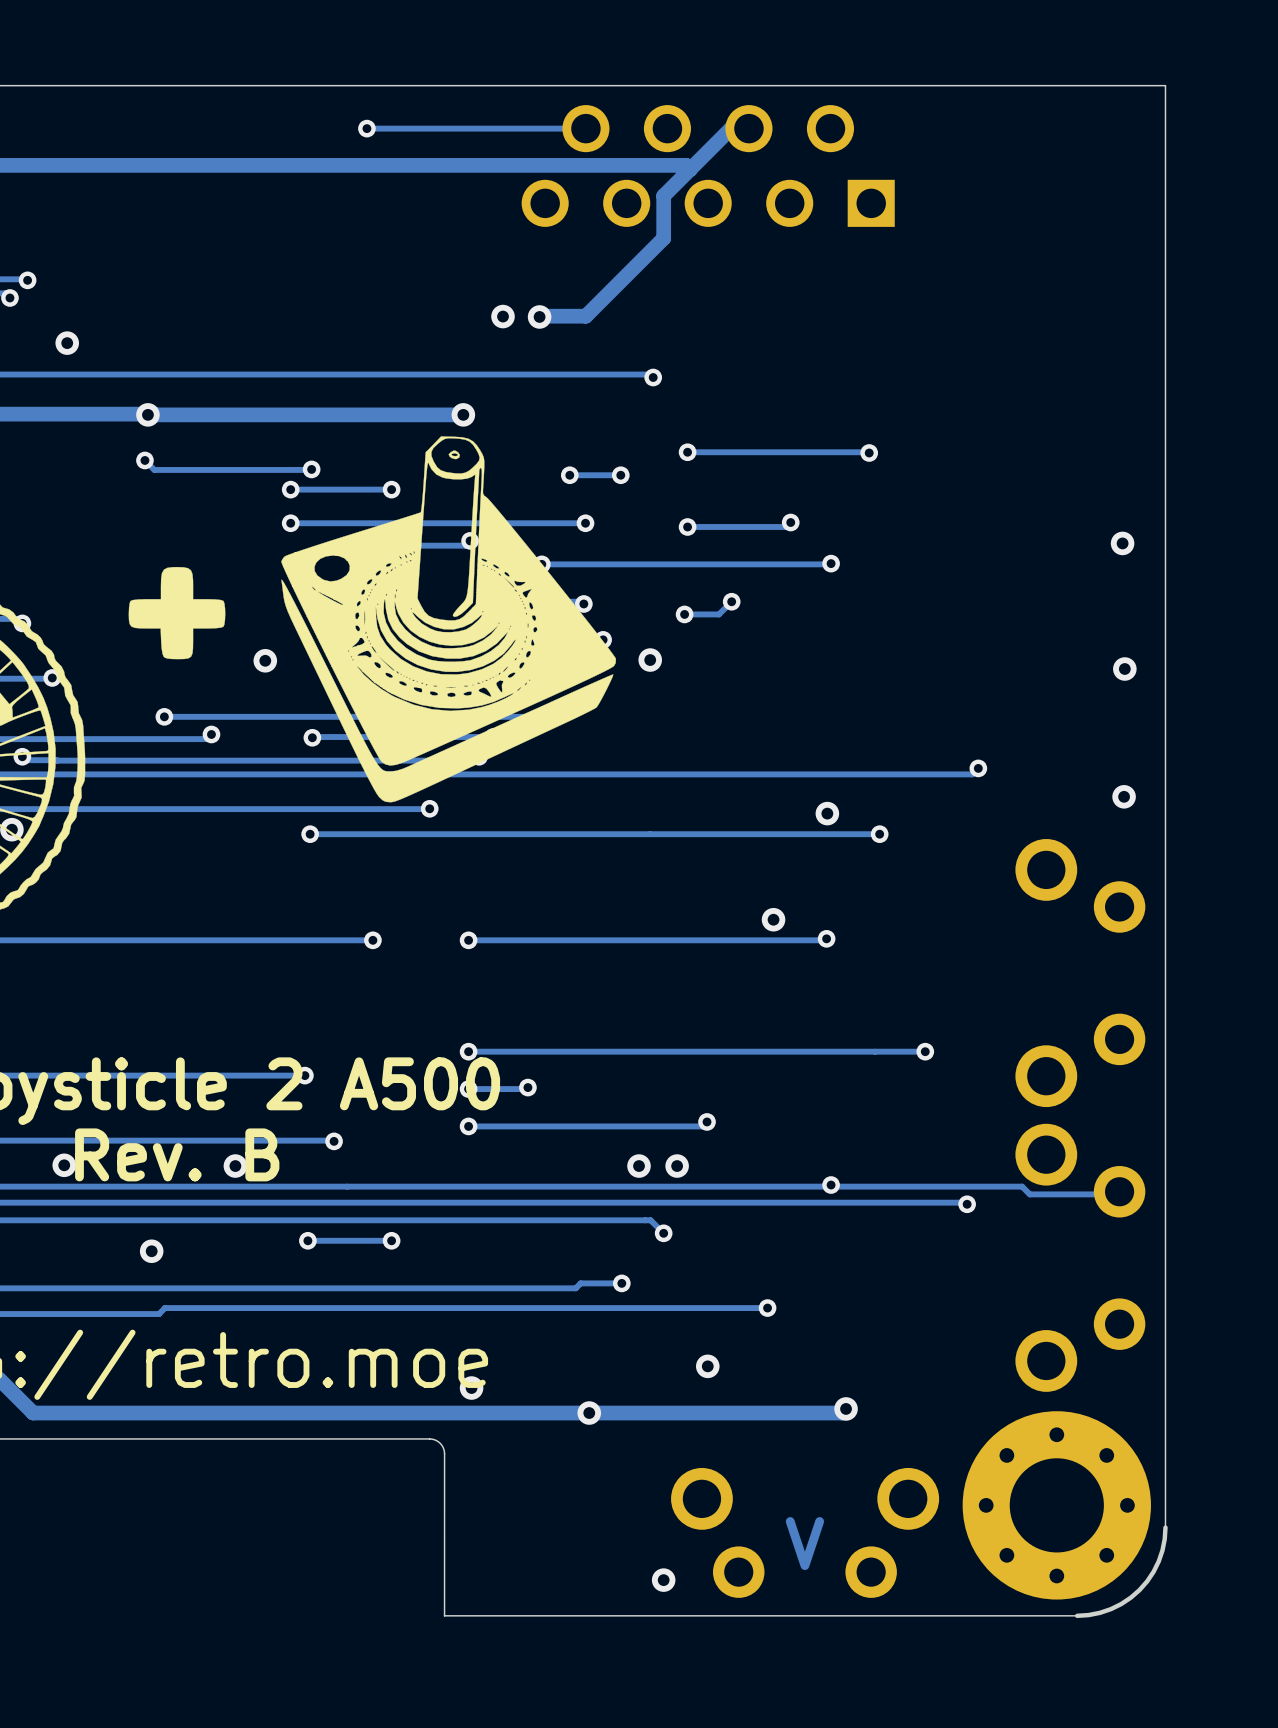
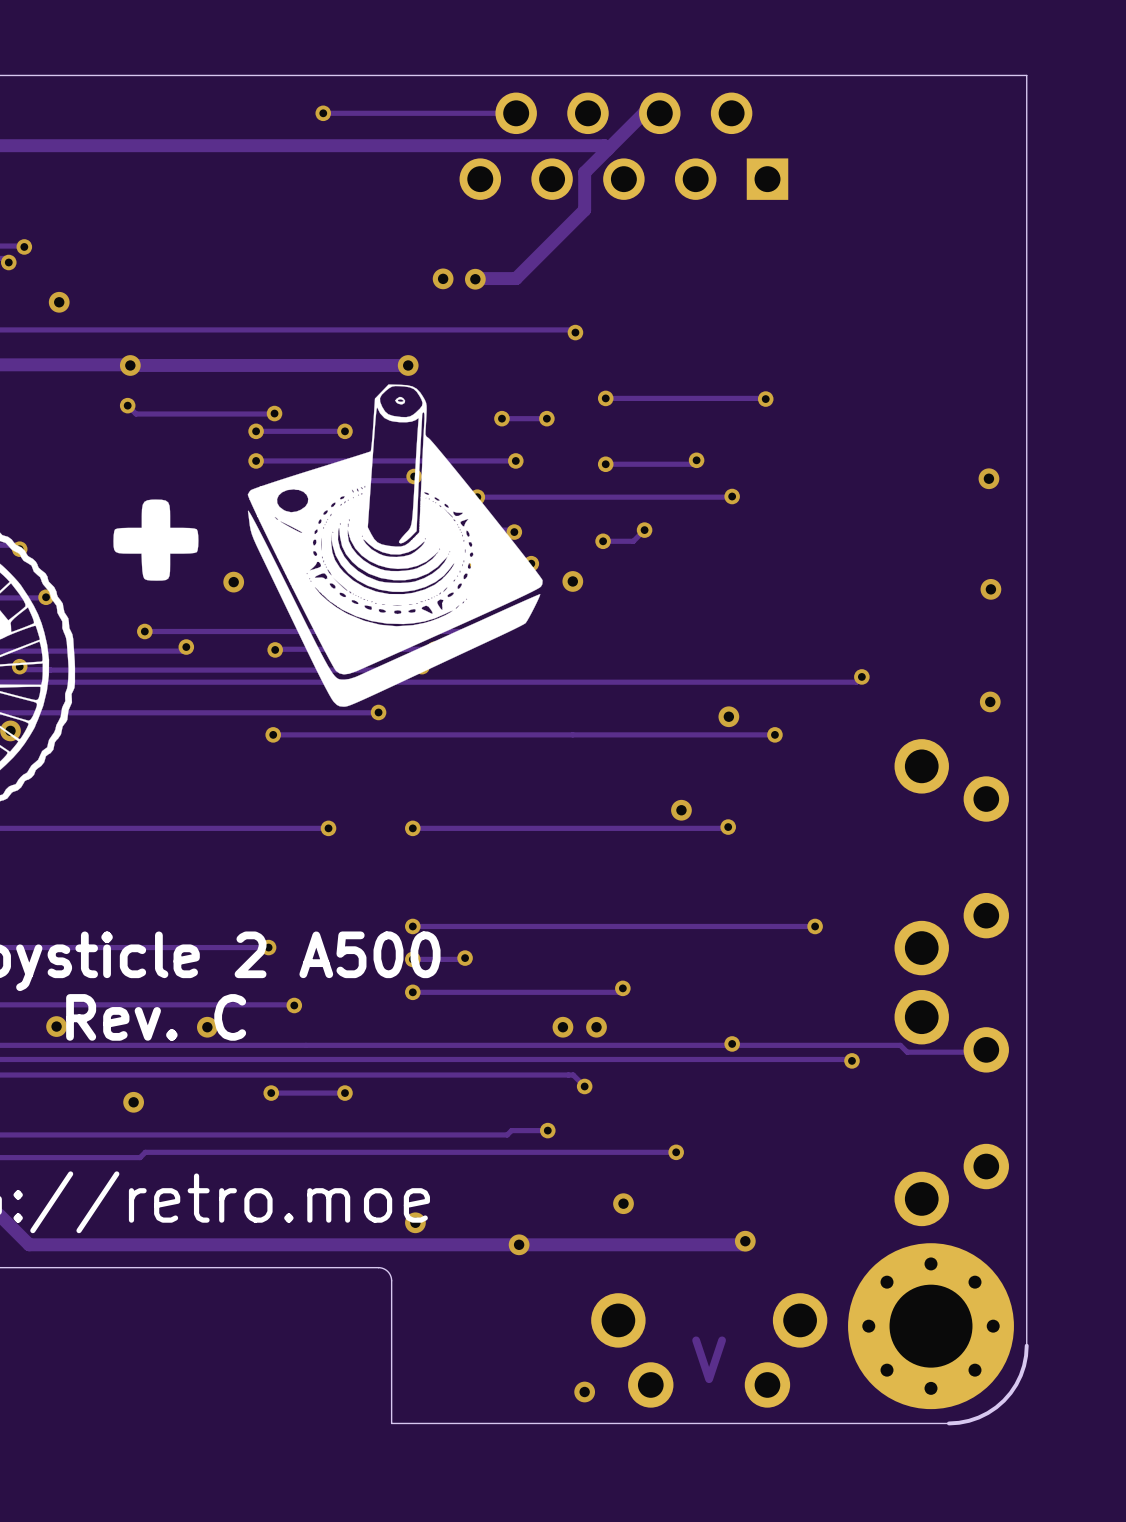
text: Rev. B (177, 1154) -> Rev. C (156, 1017)

